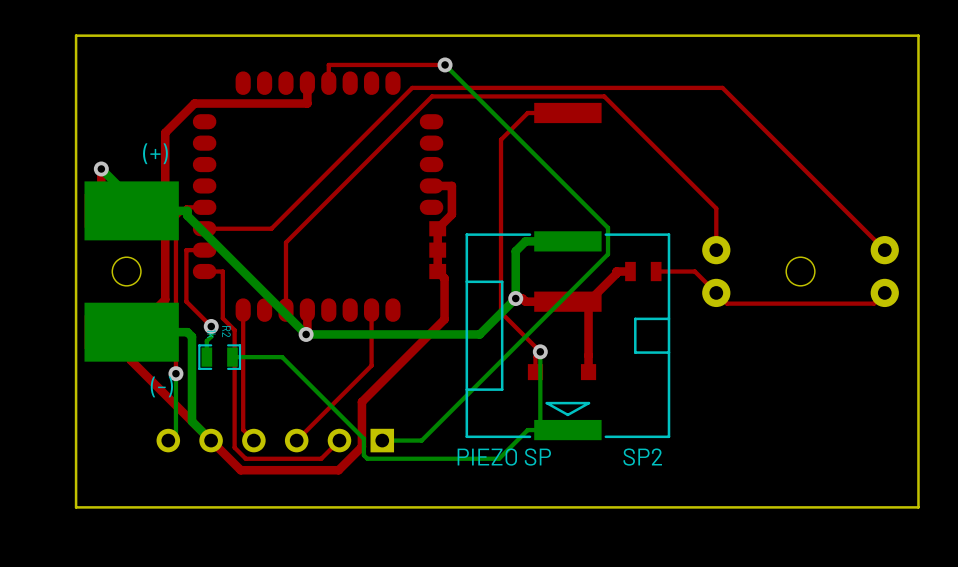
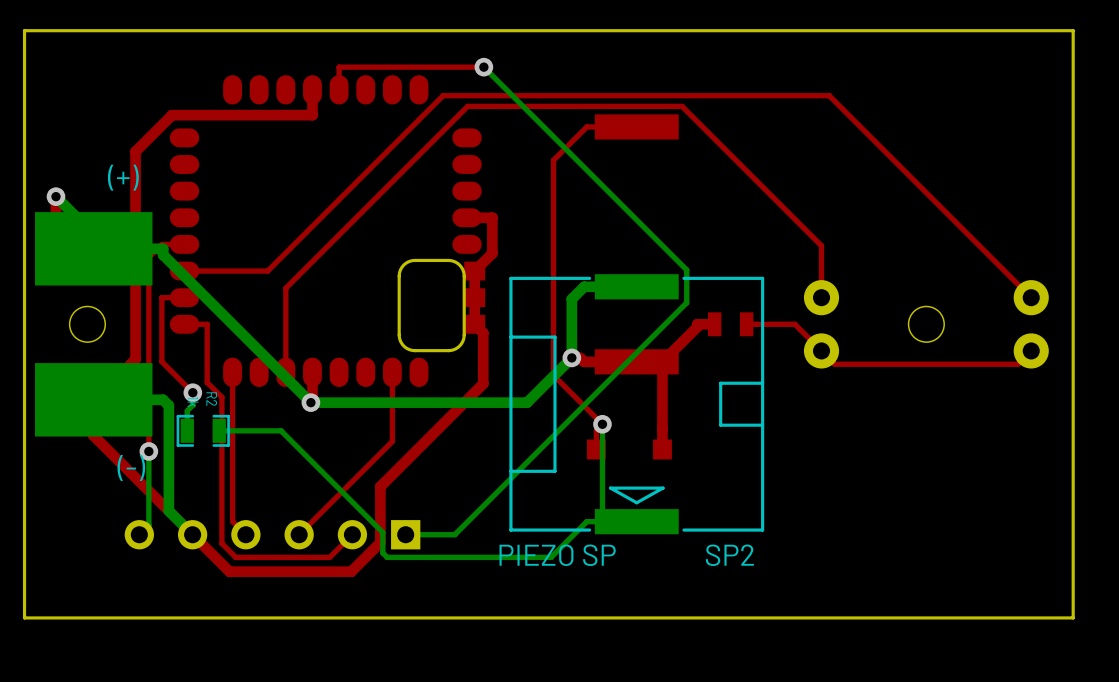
part footprint: [192, 71, 447, 322] -> [169, 75, 486, 388]

